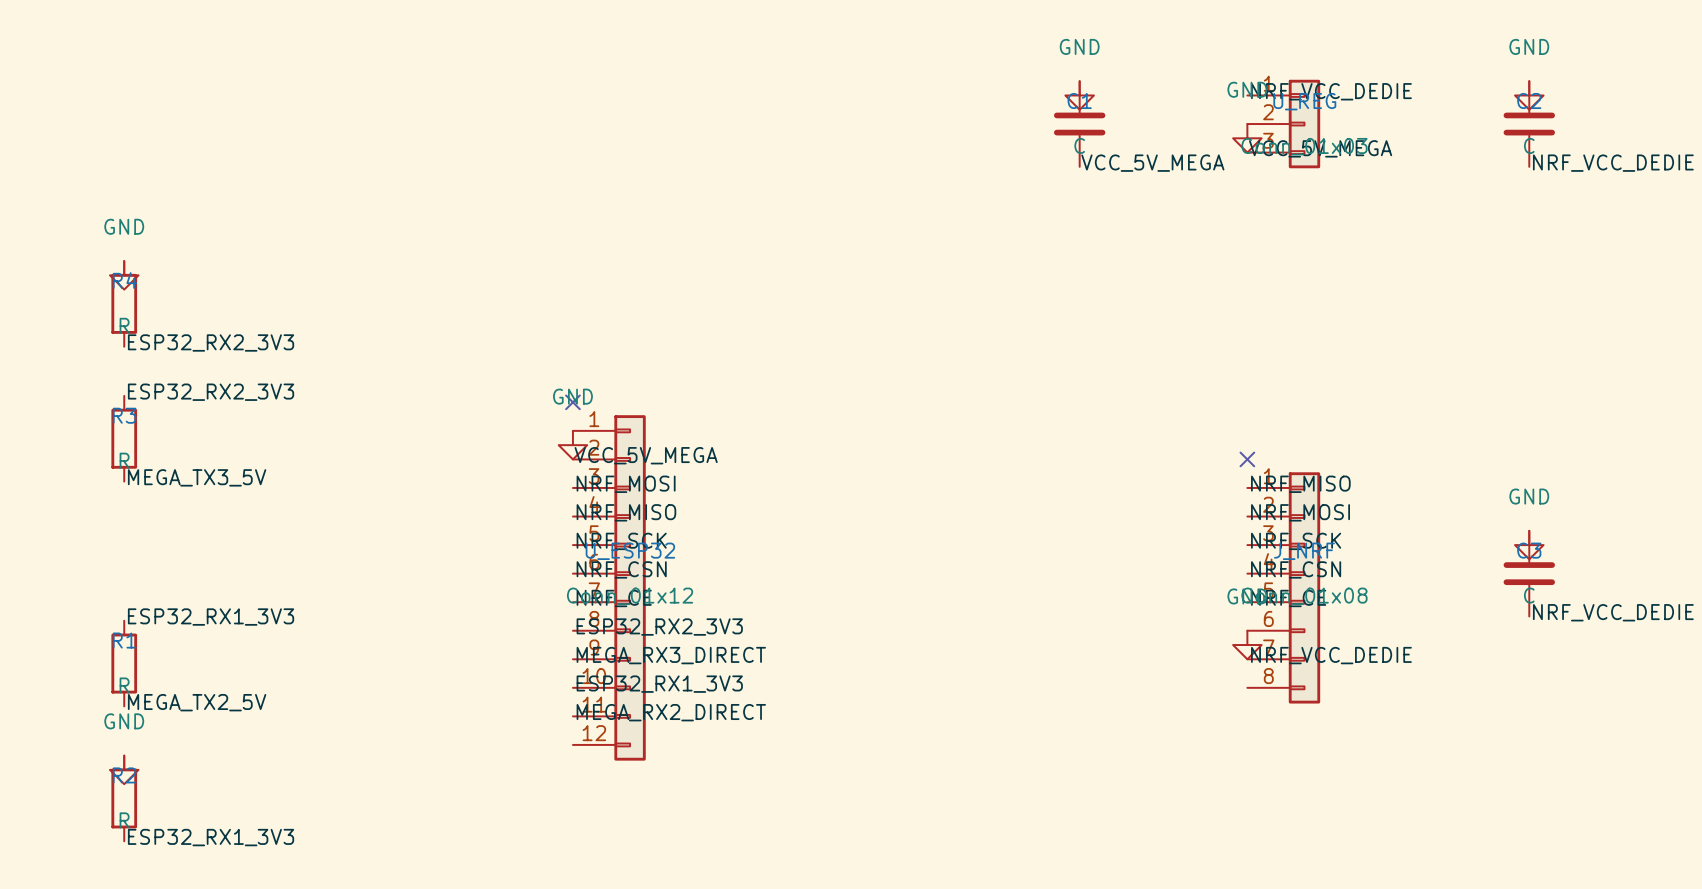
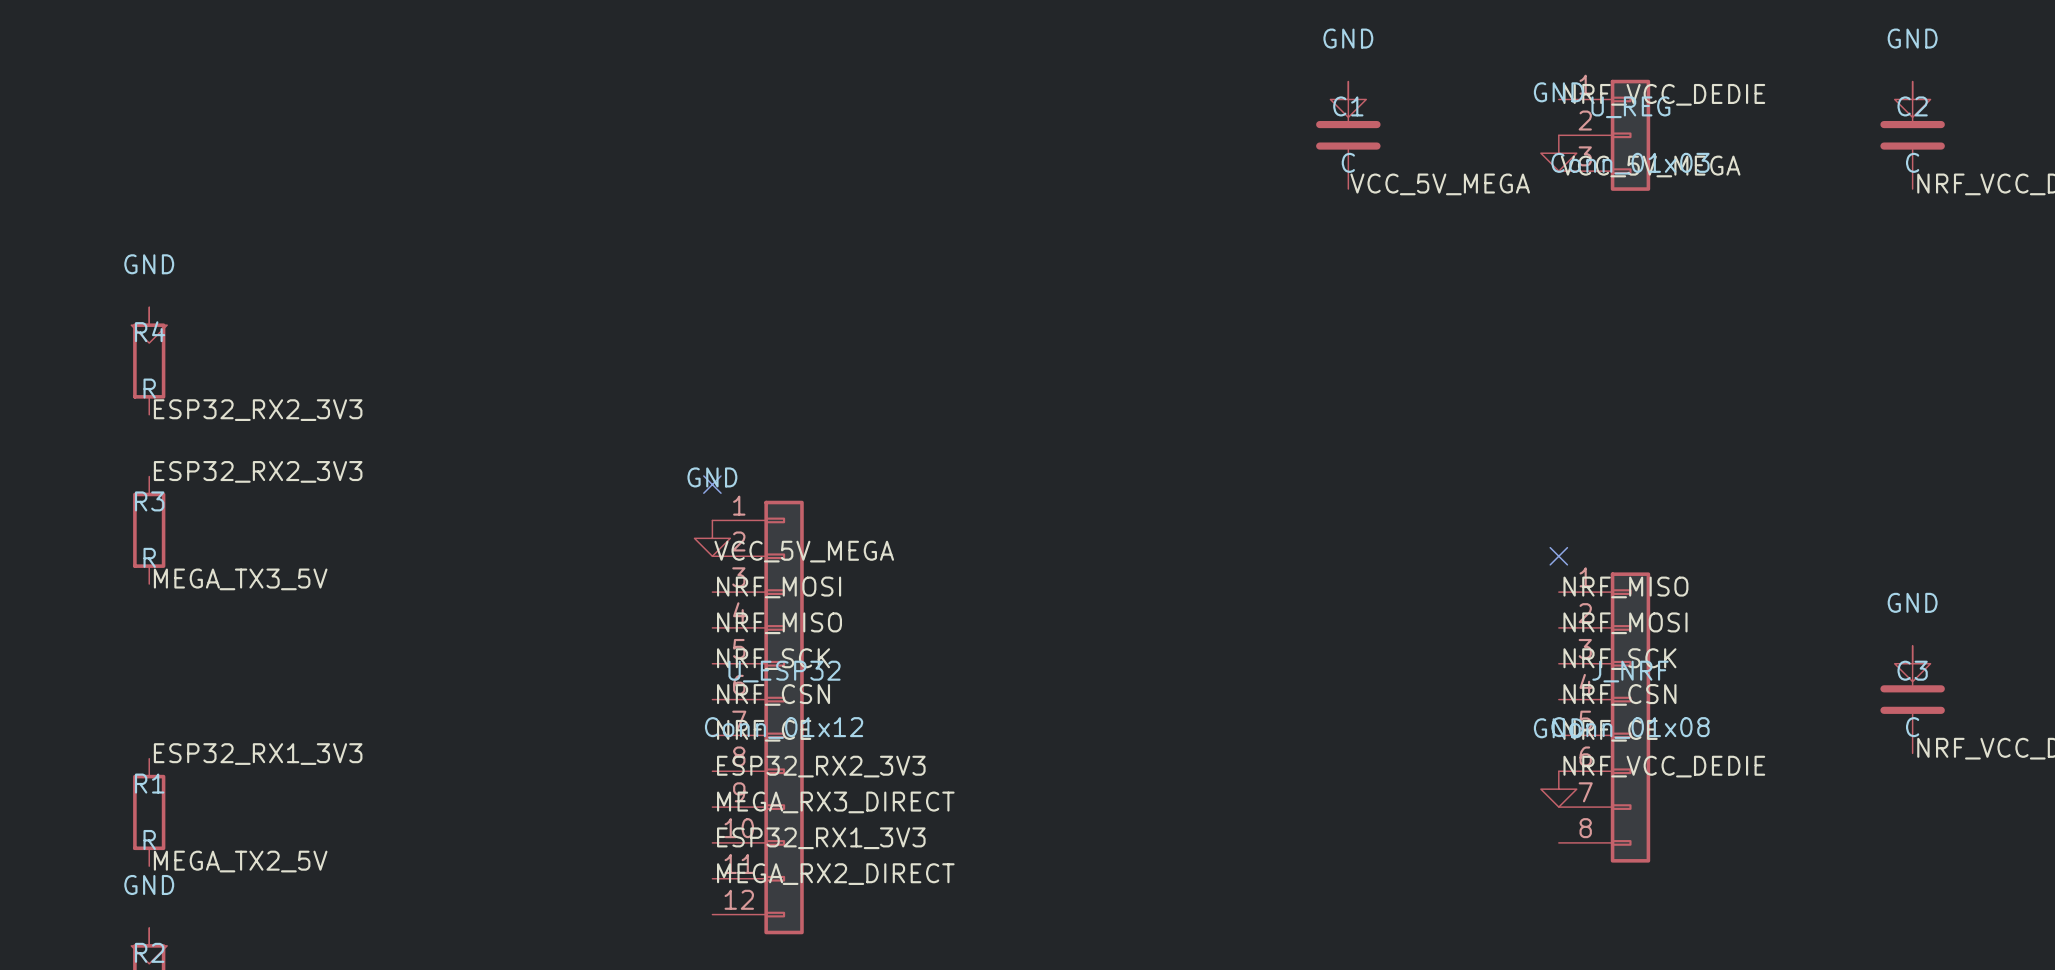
label position: NRF_VCC_DEDIE (1331, 655) -> NRF_VCC_DEDIE (1664, 766)

